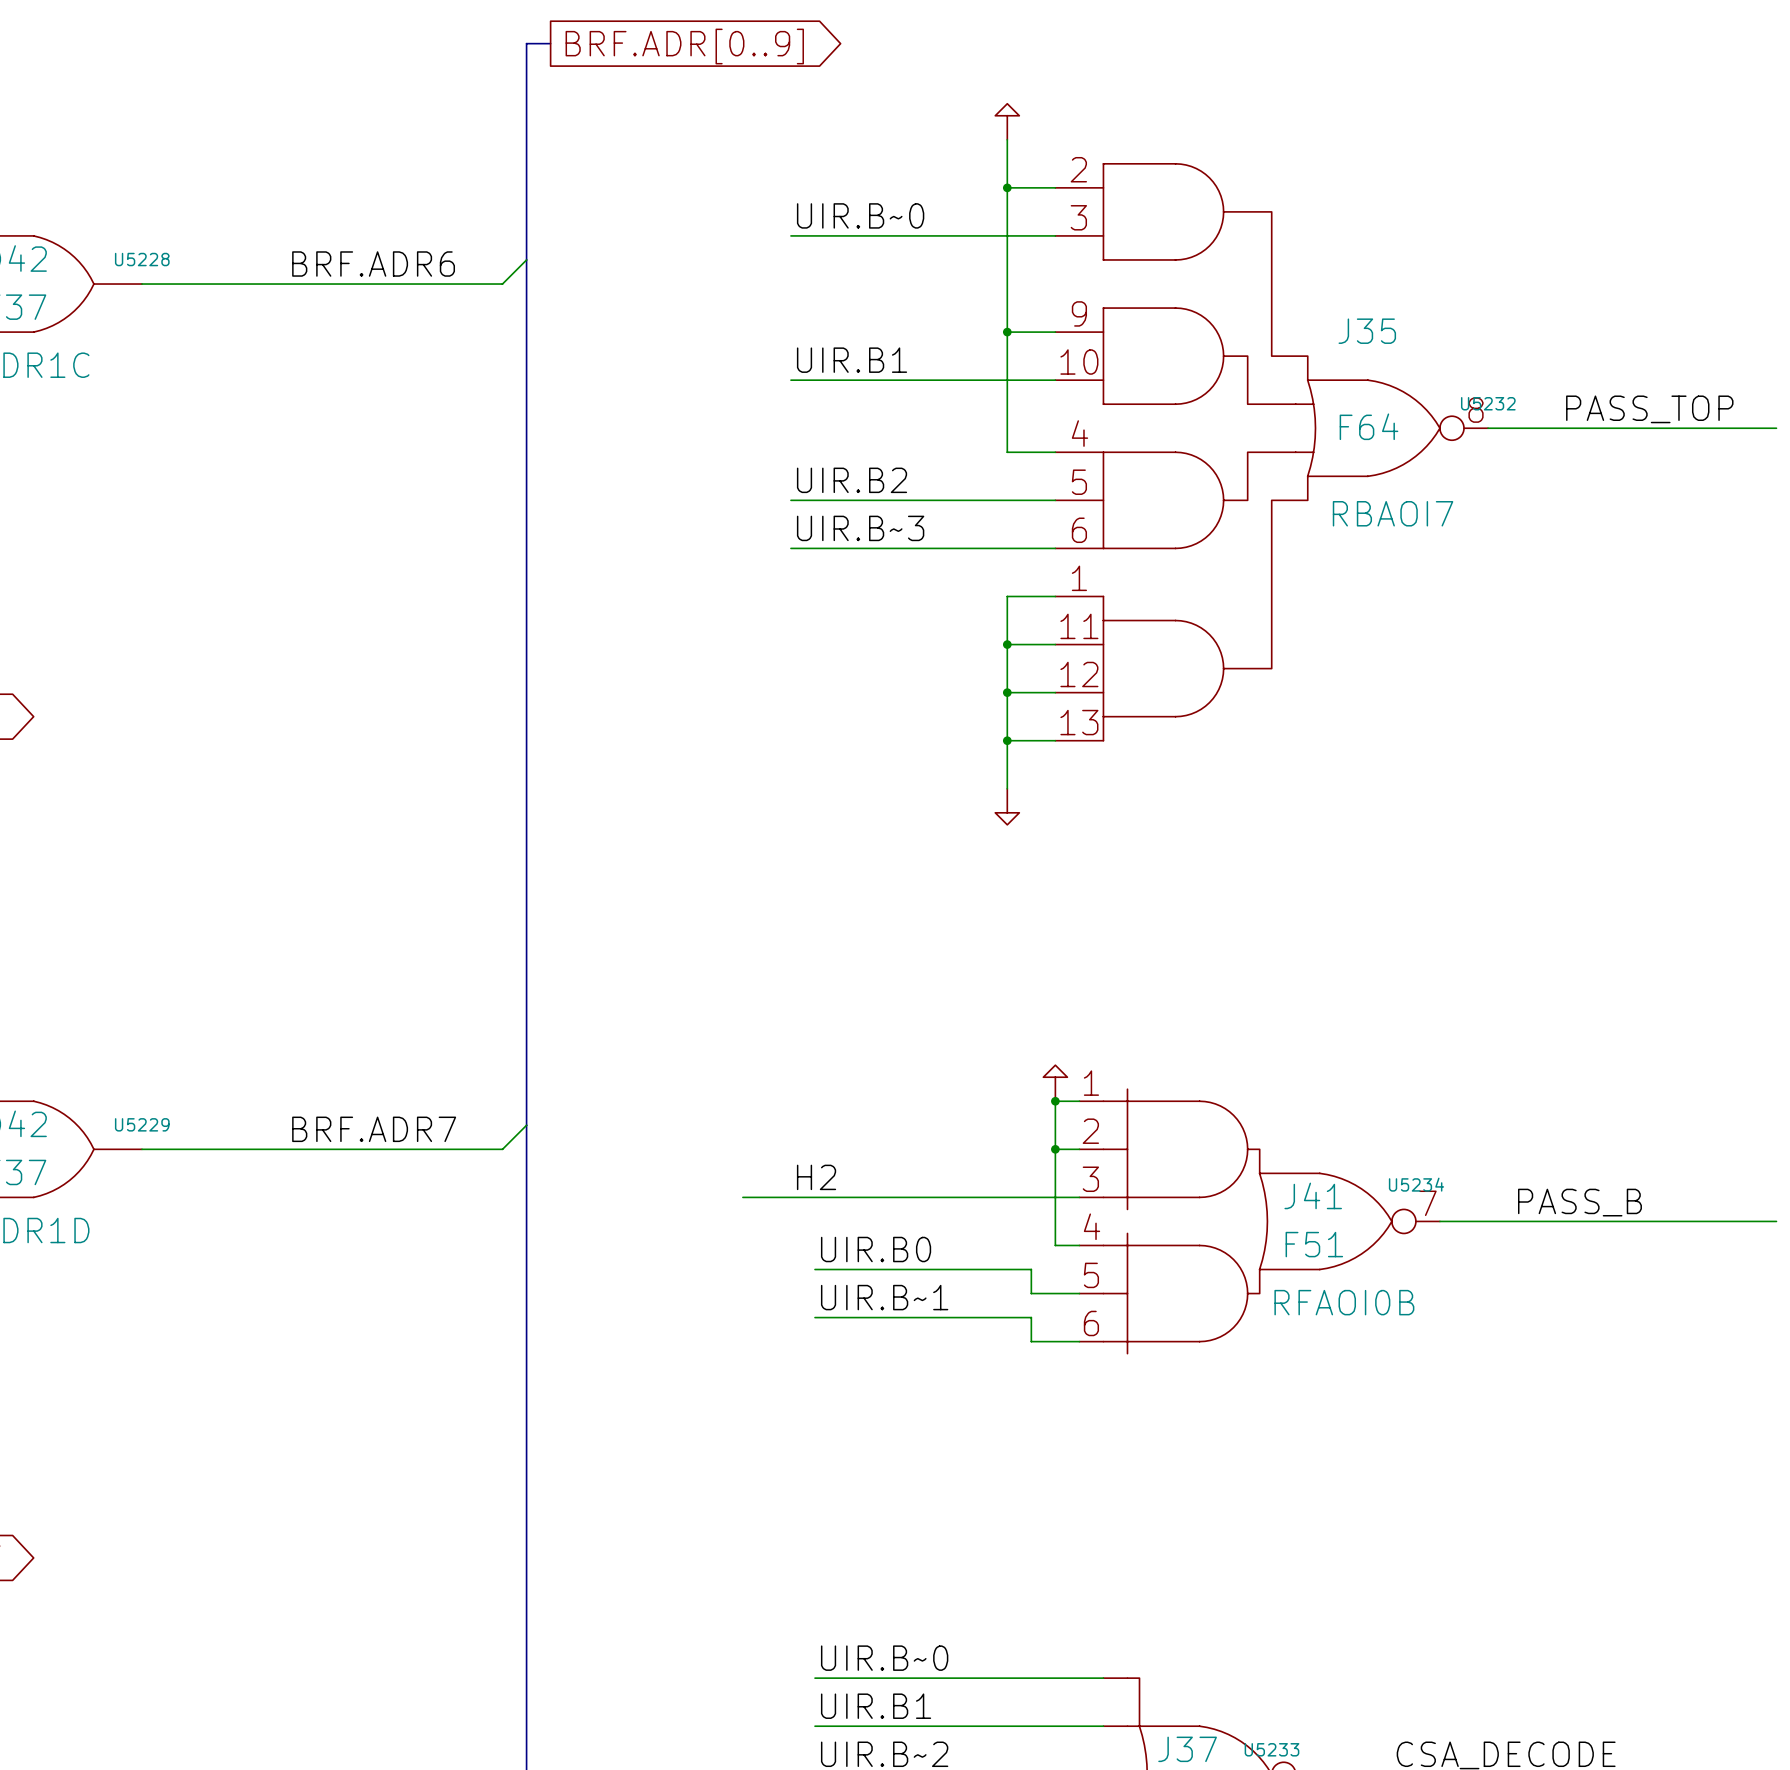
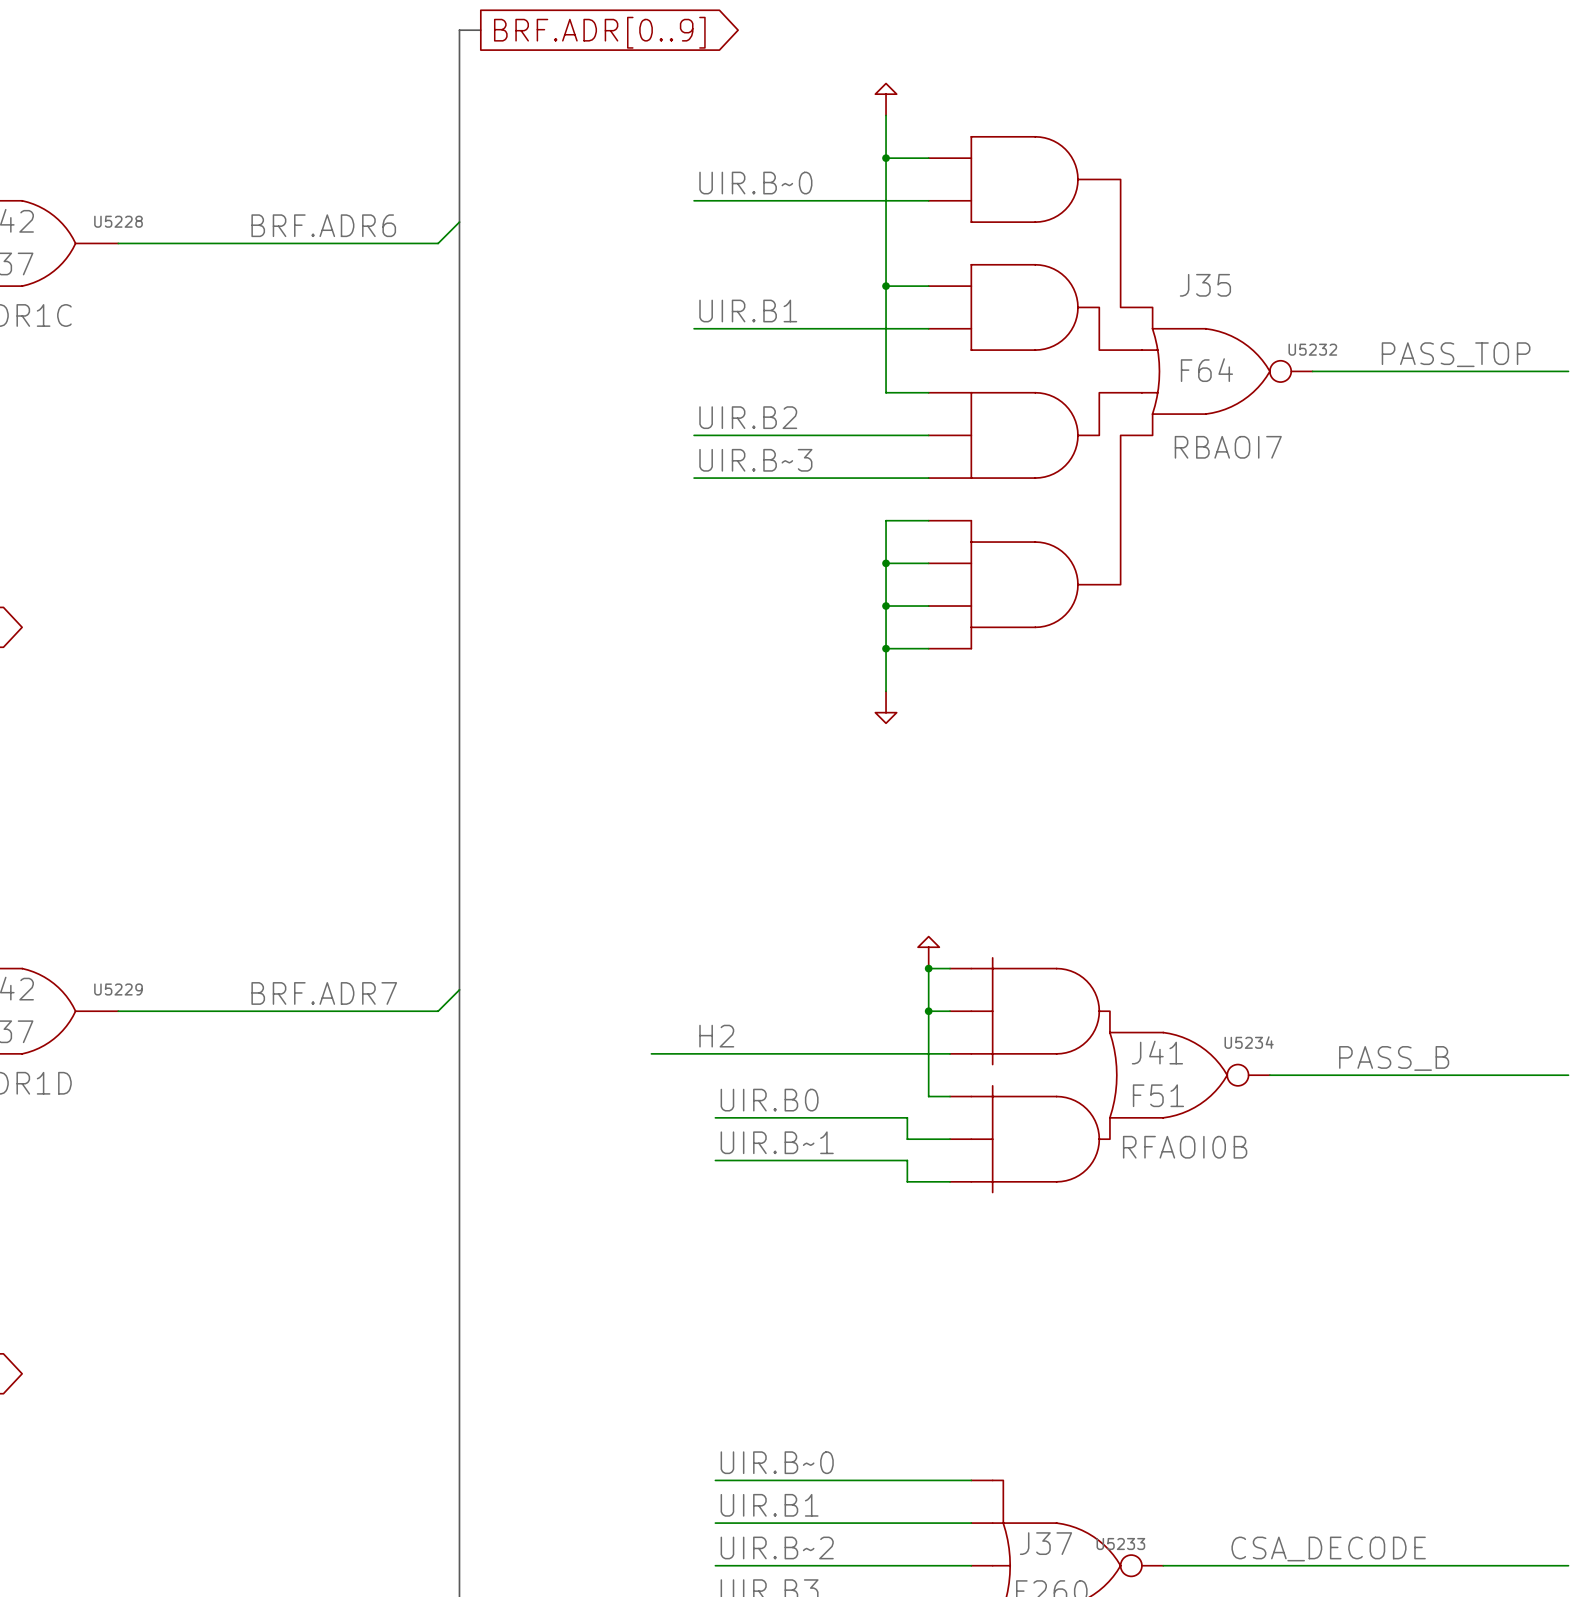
U5232 symbol: [1055, 163, 1489, 742] -> [928, 136, 1313, 650]
U5234 pin number: 1 (1091, 1083) -> none
U5234 pin number: 2 (1090, 1131) -> none
U5234 pin number: 3 (1090, 1179) -> none
U5234 pin number: 7 (1427, 1203) -> none
U5234 pin number: 4 (1092, 1226) -> none
U5234 pin number: 5 (1091, 1275) -> none
U5234 pin number: 6 (1091, 1323) -> none

